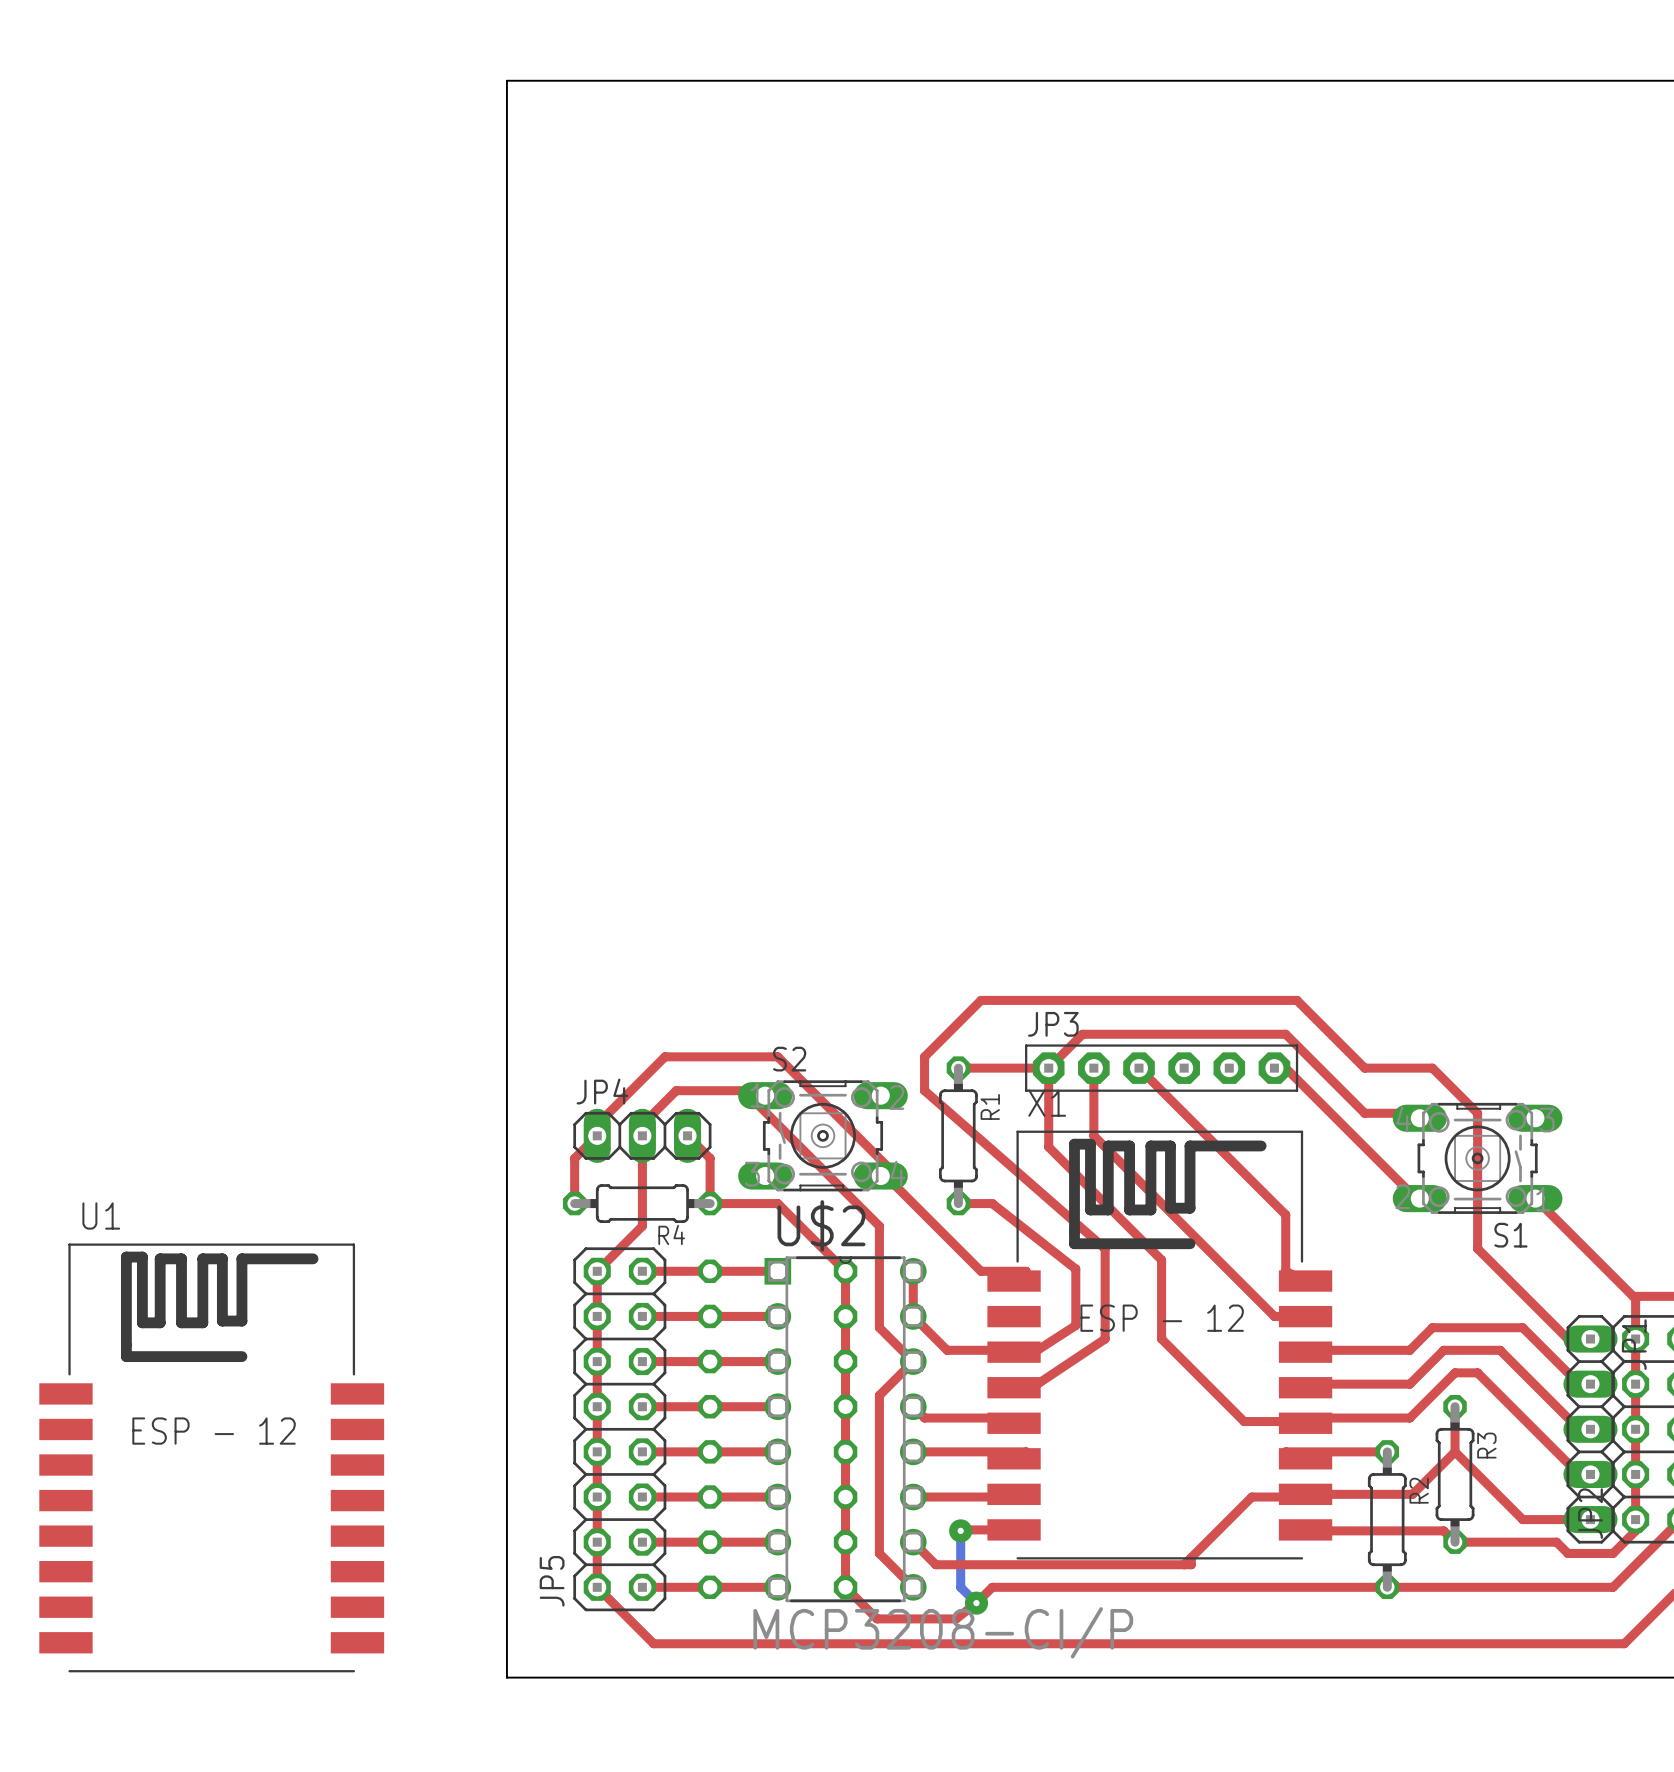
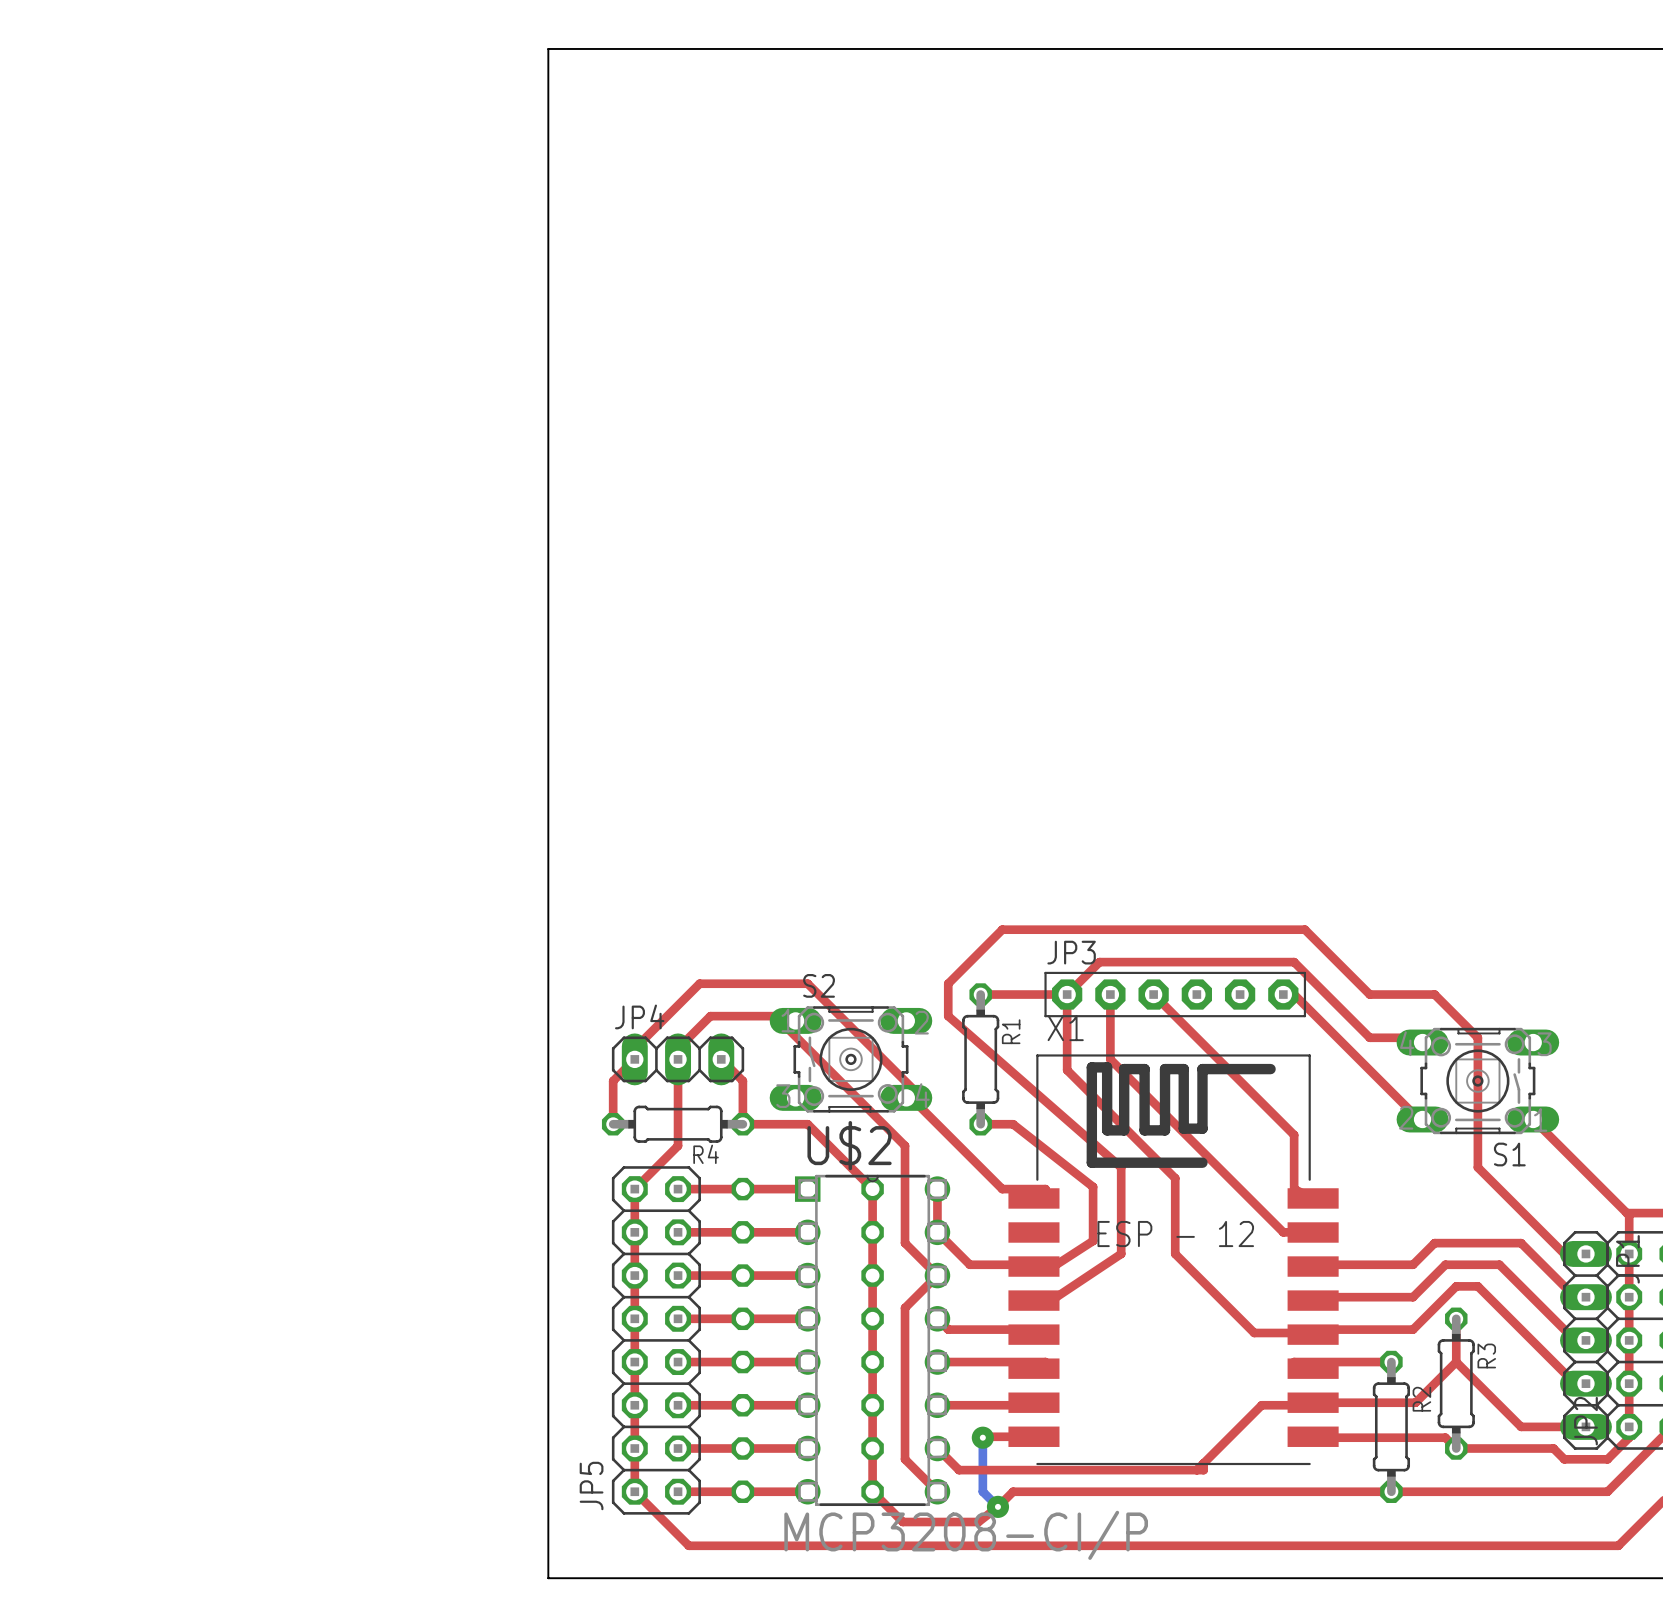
U1: (211, 1457) -> none

